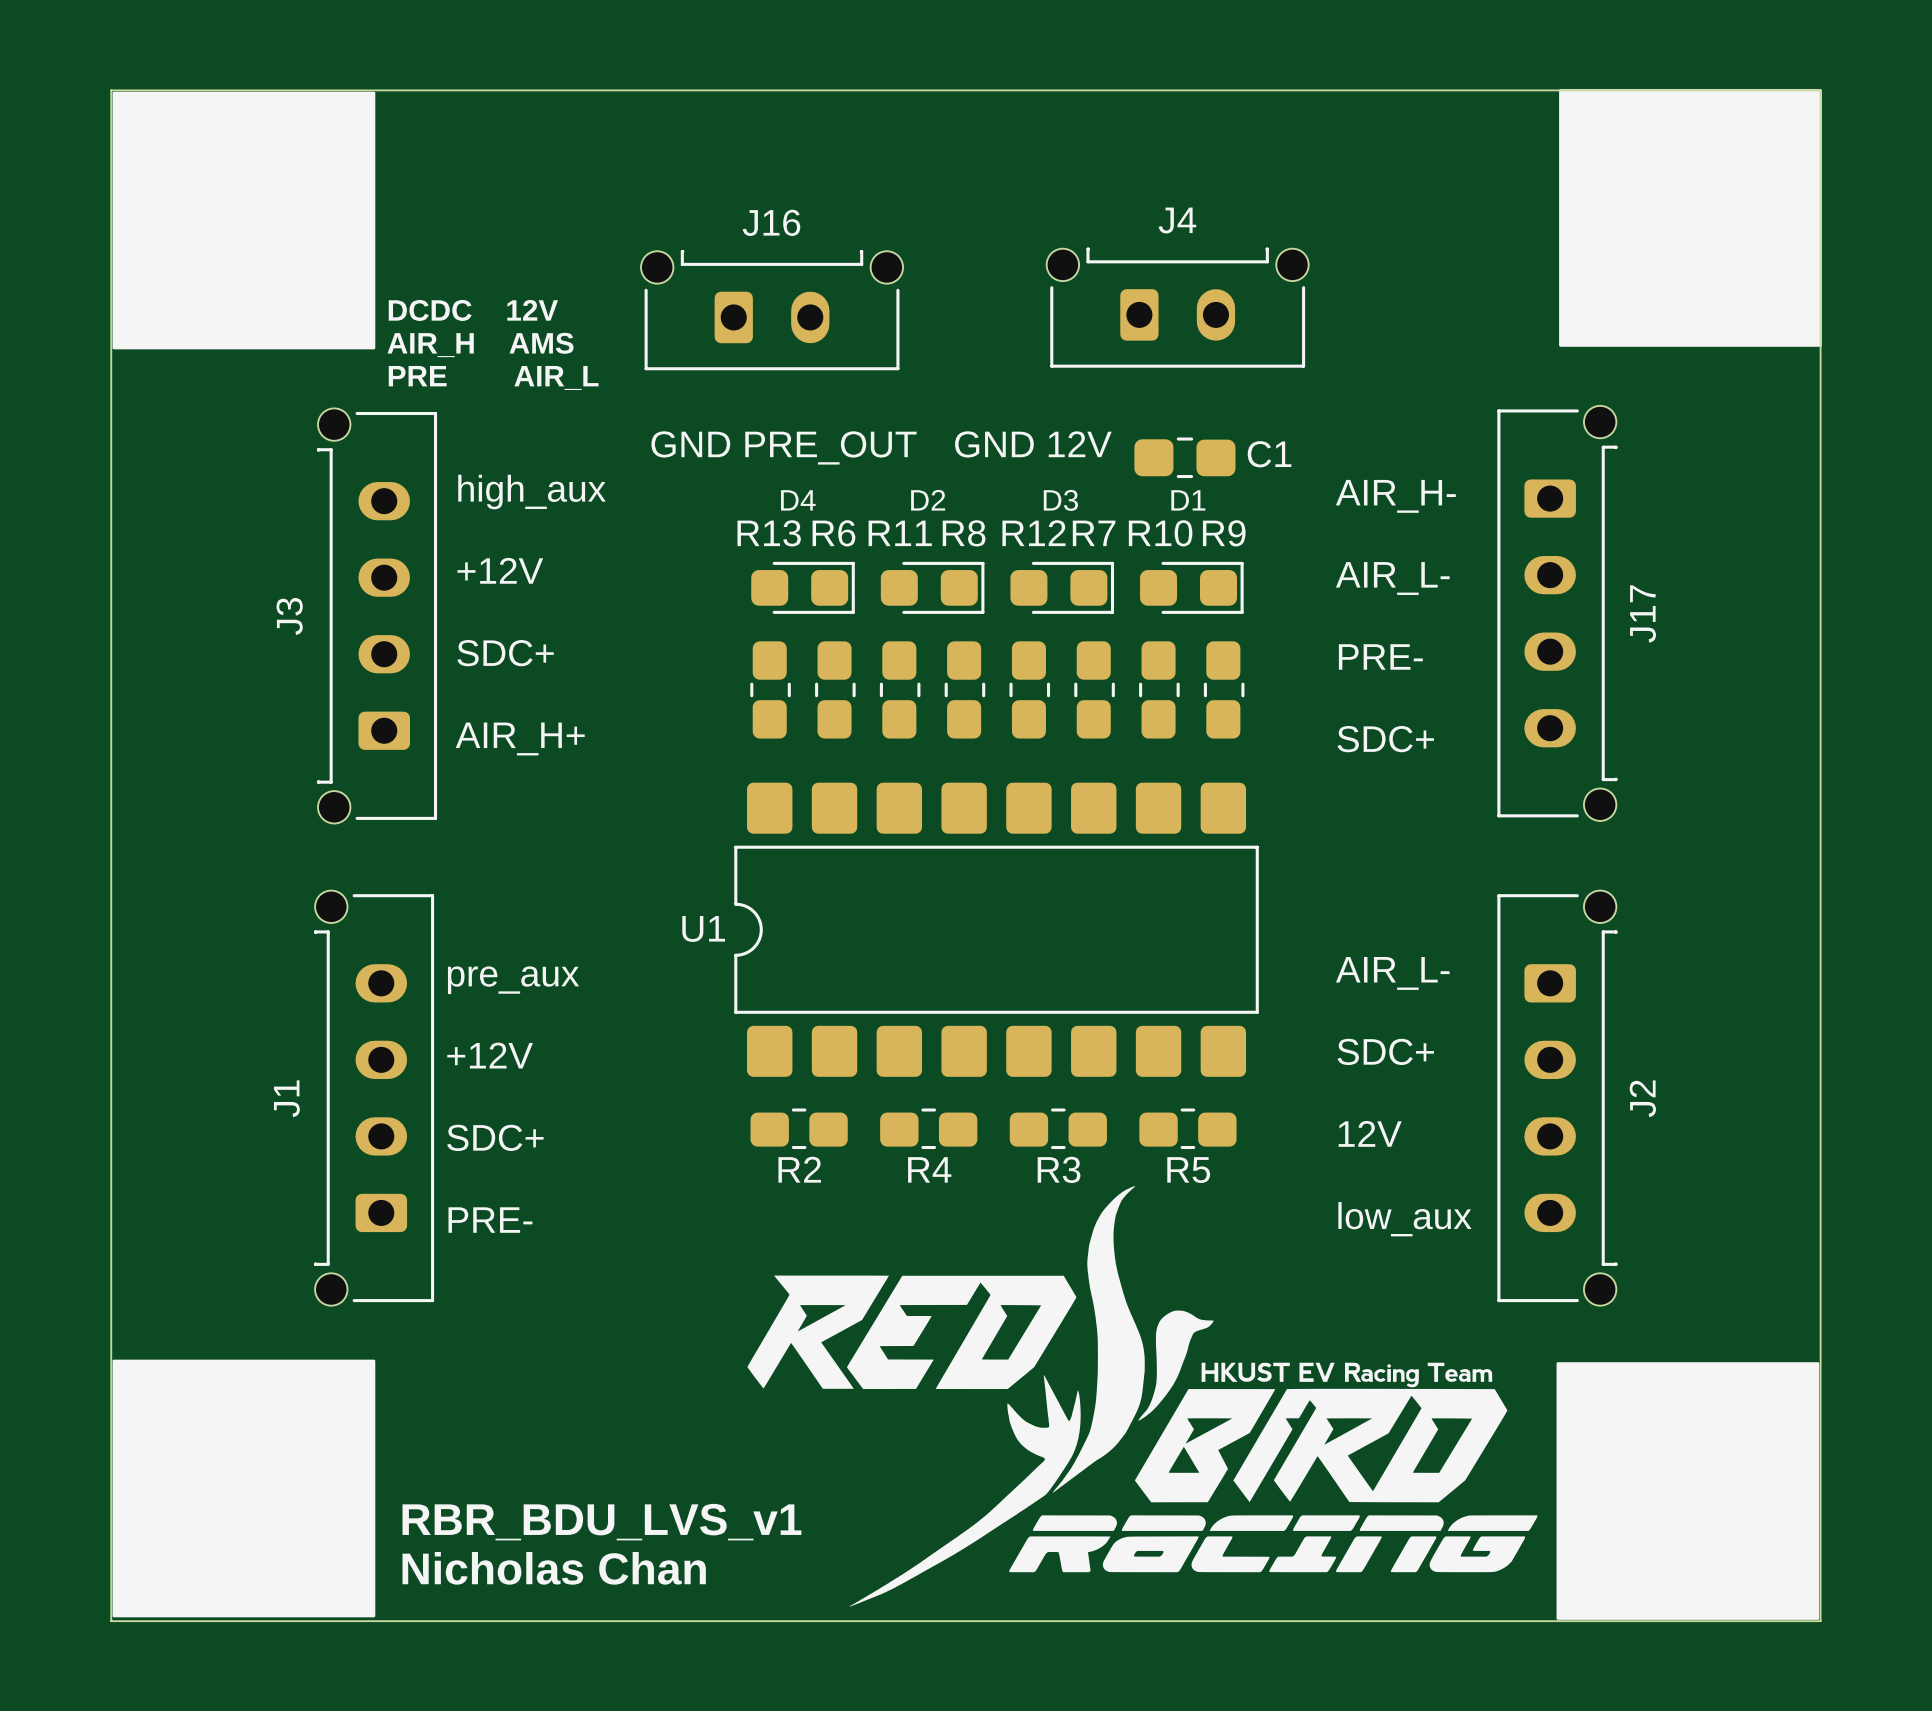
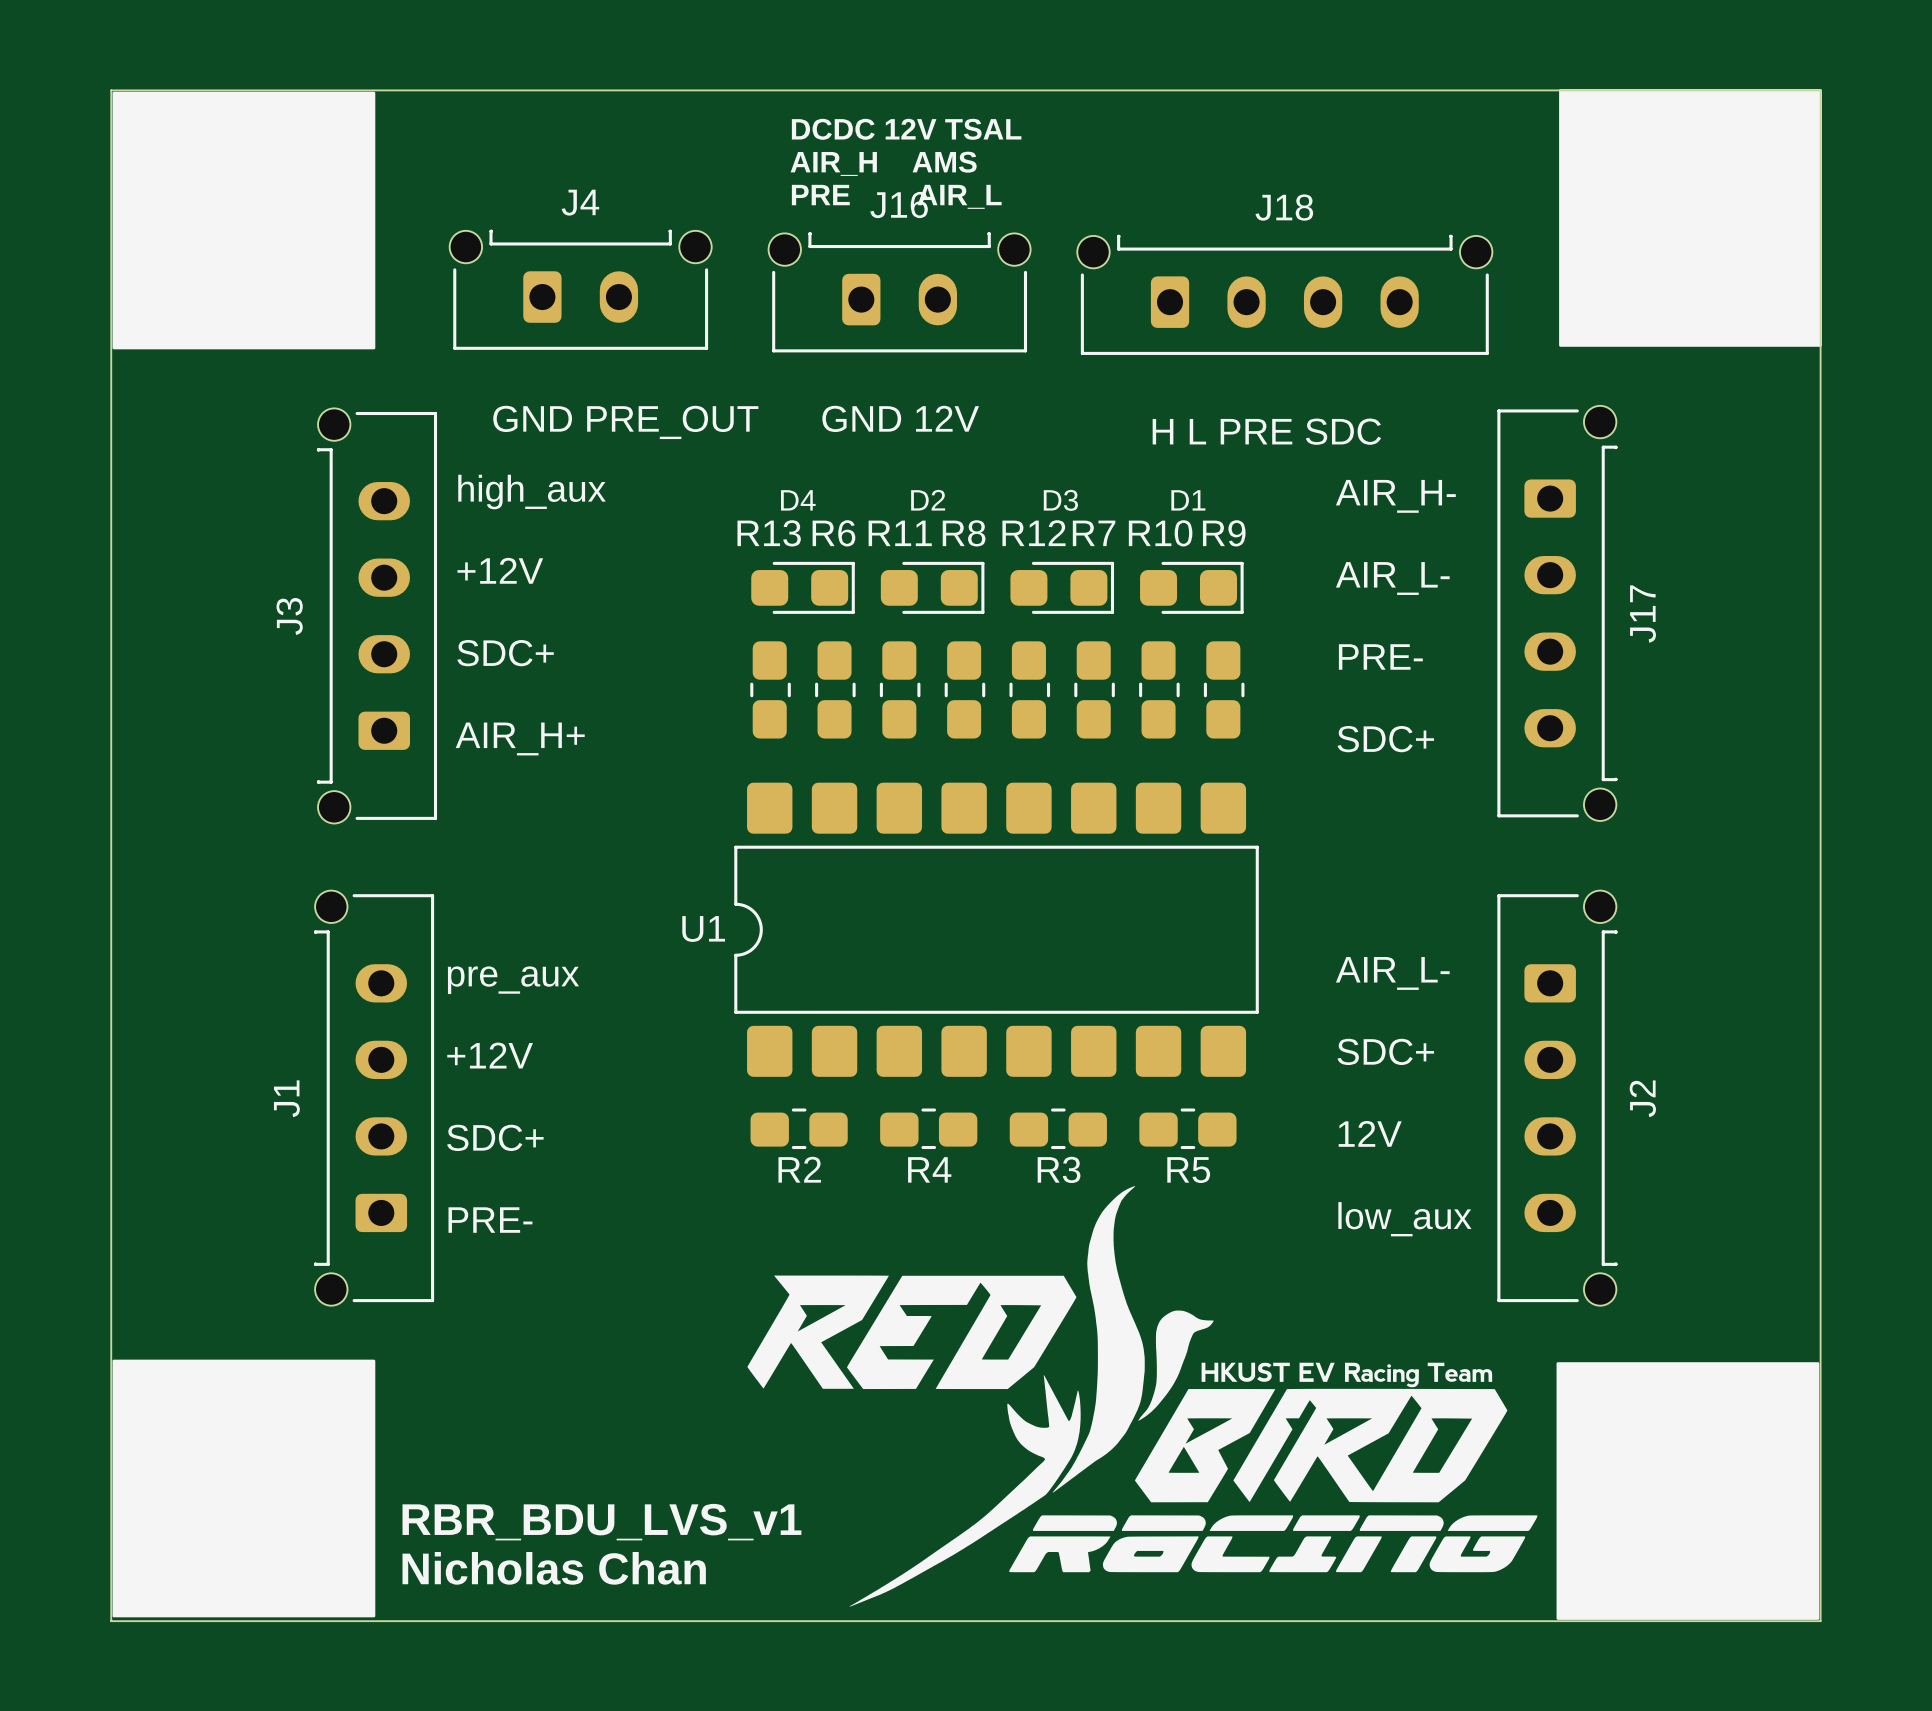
text: none -> DCDC 12V TSAL (906, 129)
J18: none -> (1284, 294)
J4 position: (1177, 307) -> (580, 289)
text: DCDC 12V (473, 310) -> none
J16 position: (772, 310) -> (899, 292)
text position: AIR_H AMS (480, 344) -> AIR_H AMS (883, 163)
text position: PRE AIR_L (493, 377) -> PRE AIR_L (896, 196)
text: none -> H L PRE SDC (1266, 431)
text position: GND 12V (1033, 444) -> GND 12V (900, 418)
text position: GND PRE_OUT (784, 447) -> GND PRE_OUT (625, 422)
C1: (1184, 457) -> none

